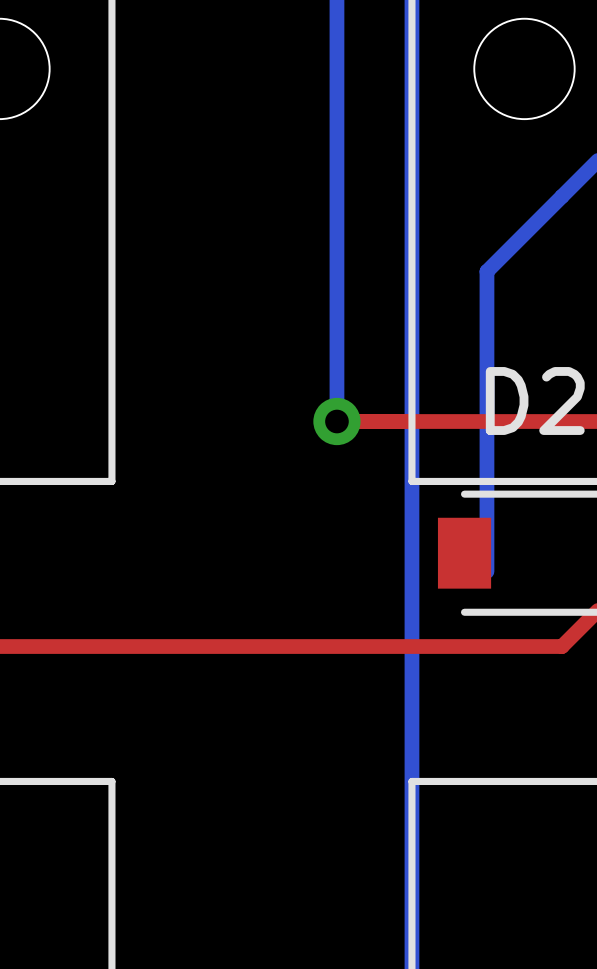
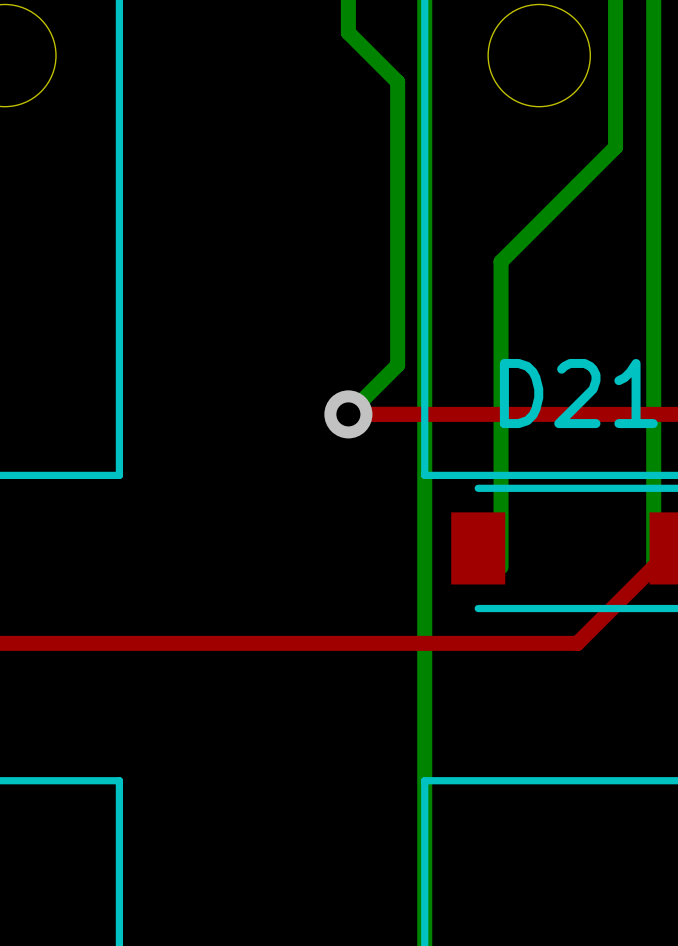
bottom track: (336, 46) (336, 421) -> (348, 32) (397, 82) (397, 365) (348, 414)

